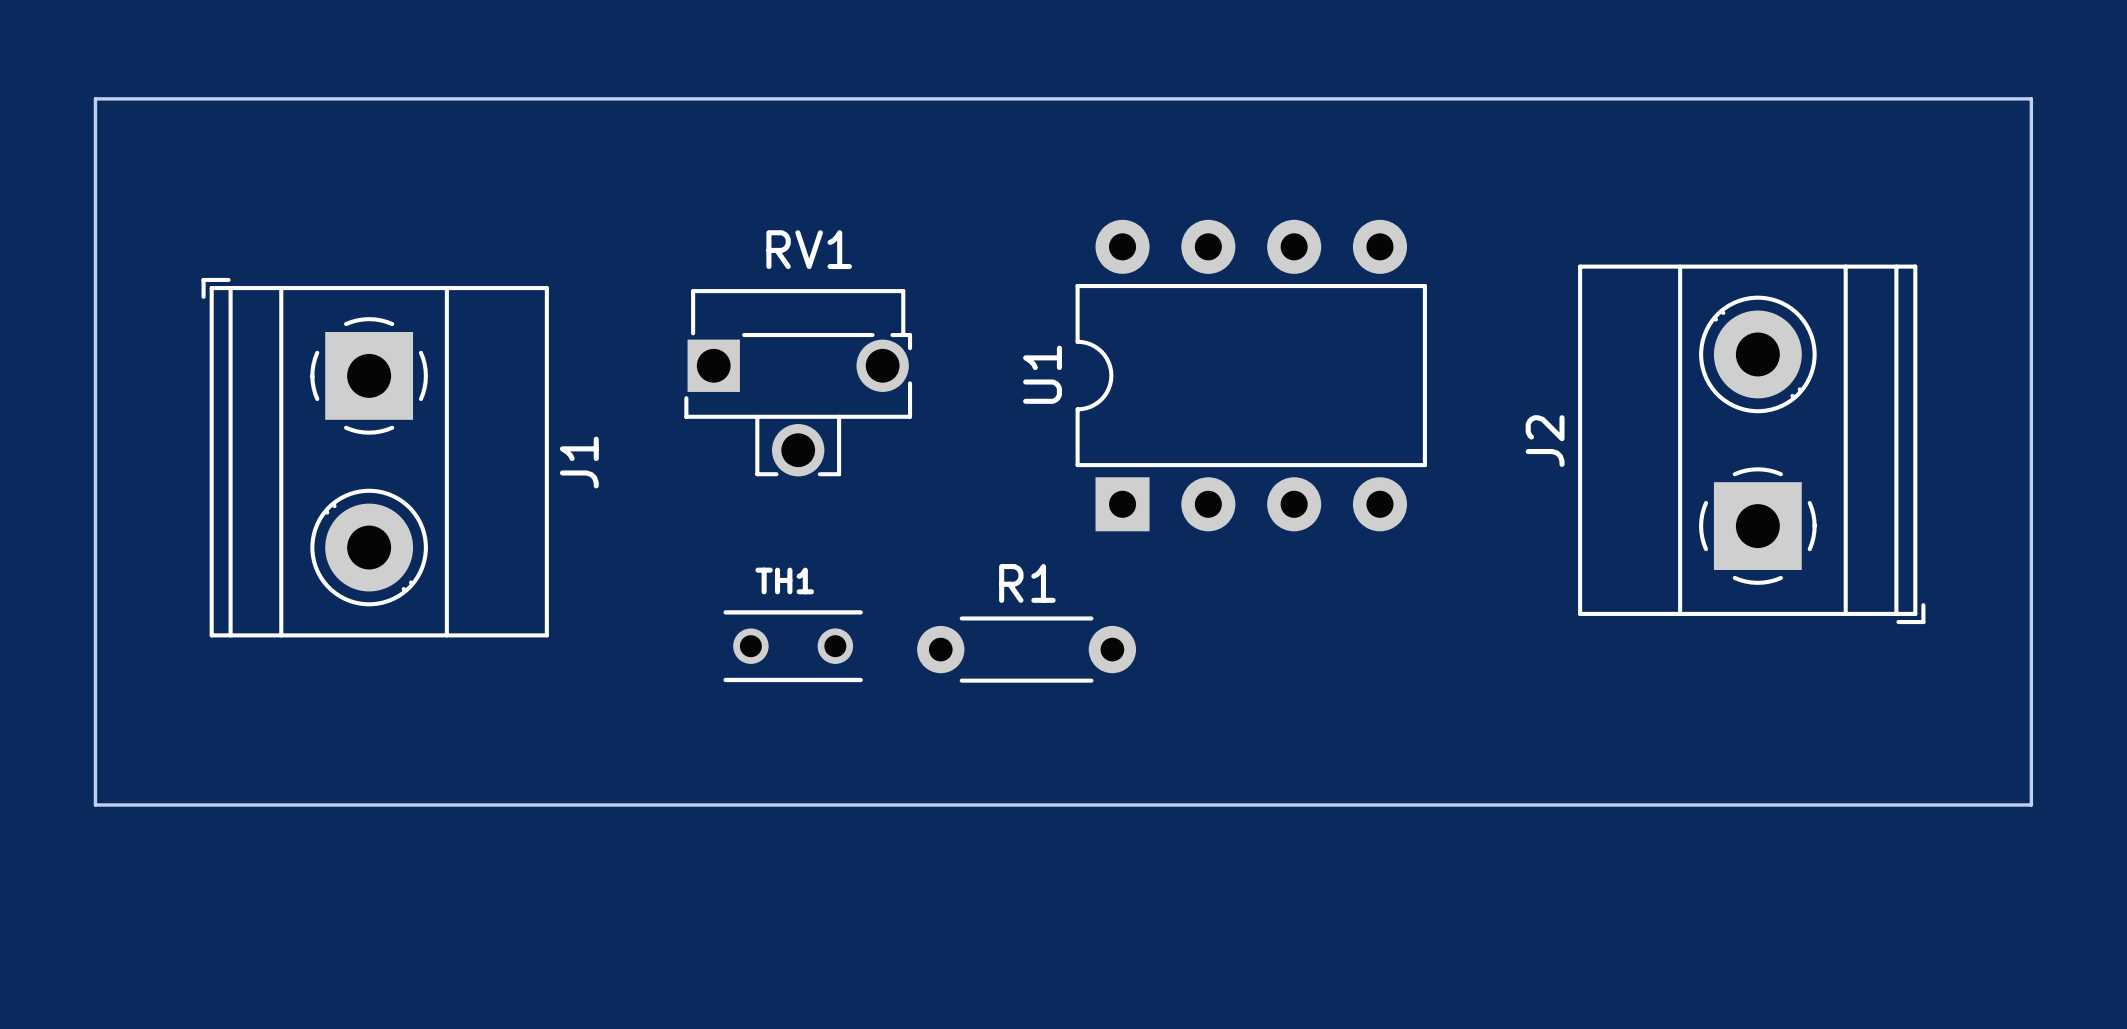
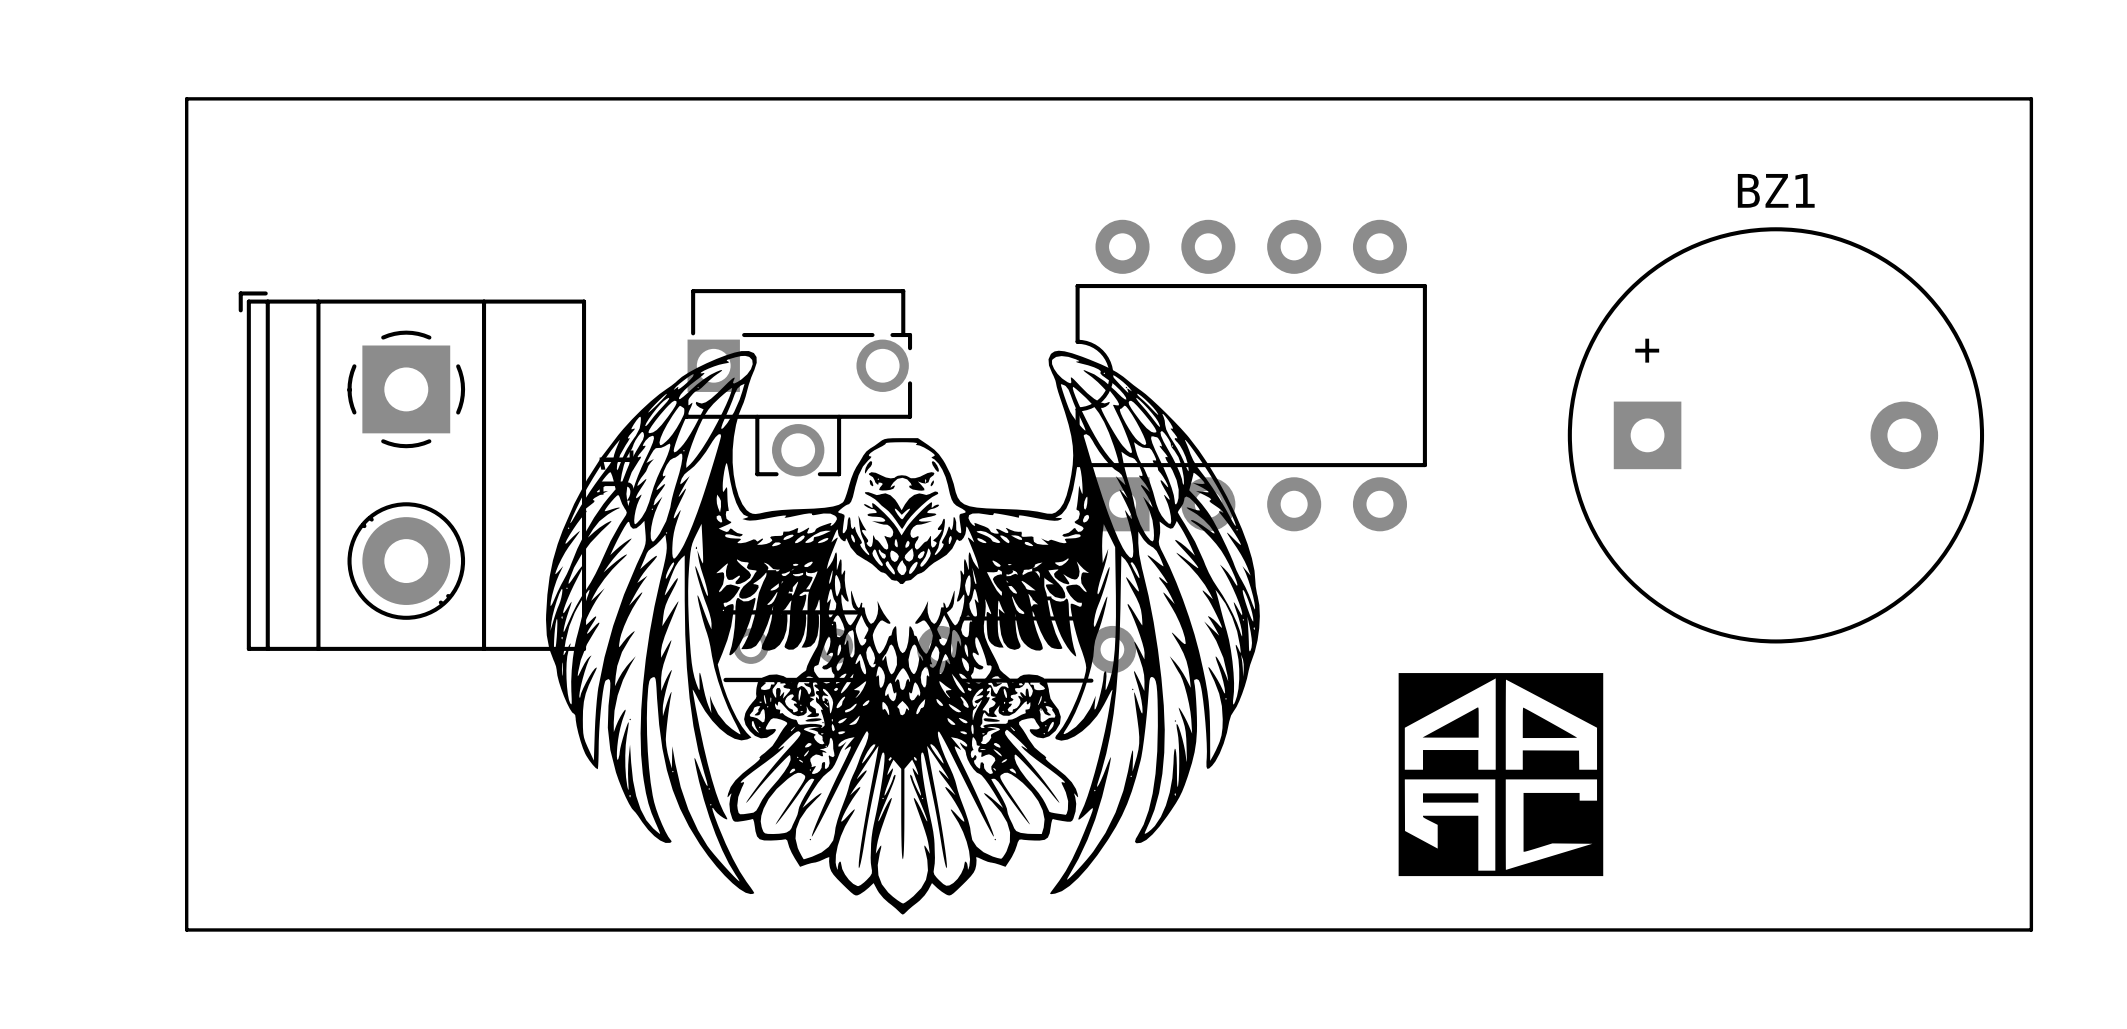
board edge: (186, 98) (95, 98) (95, 804) (2031, 804) -> (186, 98) (186, 929) (2031, 929) (2031, 804)
RV1 name: RV1 (809, 249) -> none
drawing: none -> [546, 350, 1260, 915]
U1 name: U1 (1042, 374) -> none
BZ1: none -> (1775, 435)
J2: (1751, 444) -> none
J1 position: (375, 457) -> (412, 471)
drawing: none -> [1398, 673, 1604, 877]

